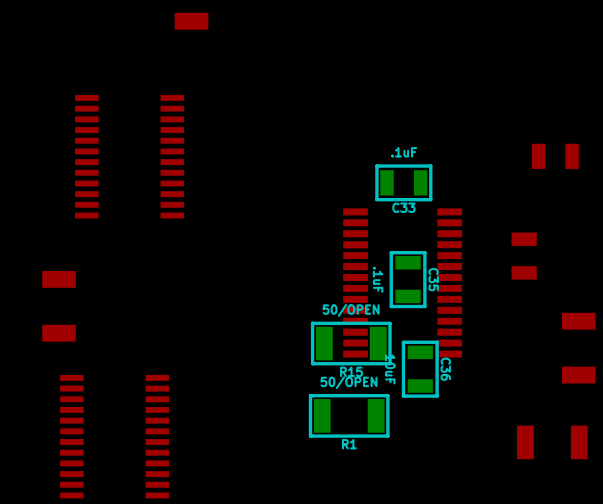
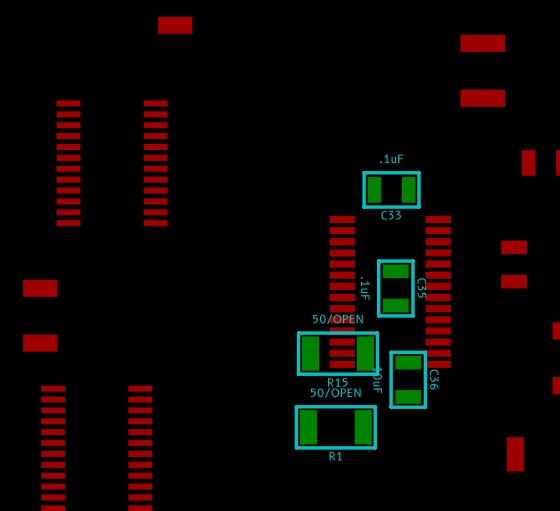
part: none -> (482, 70)

